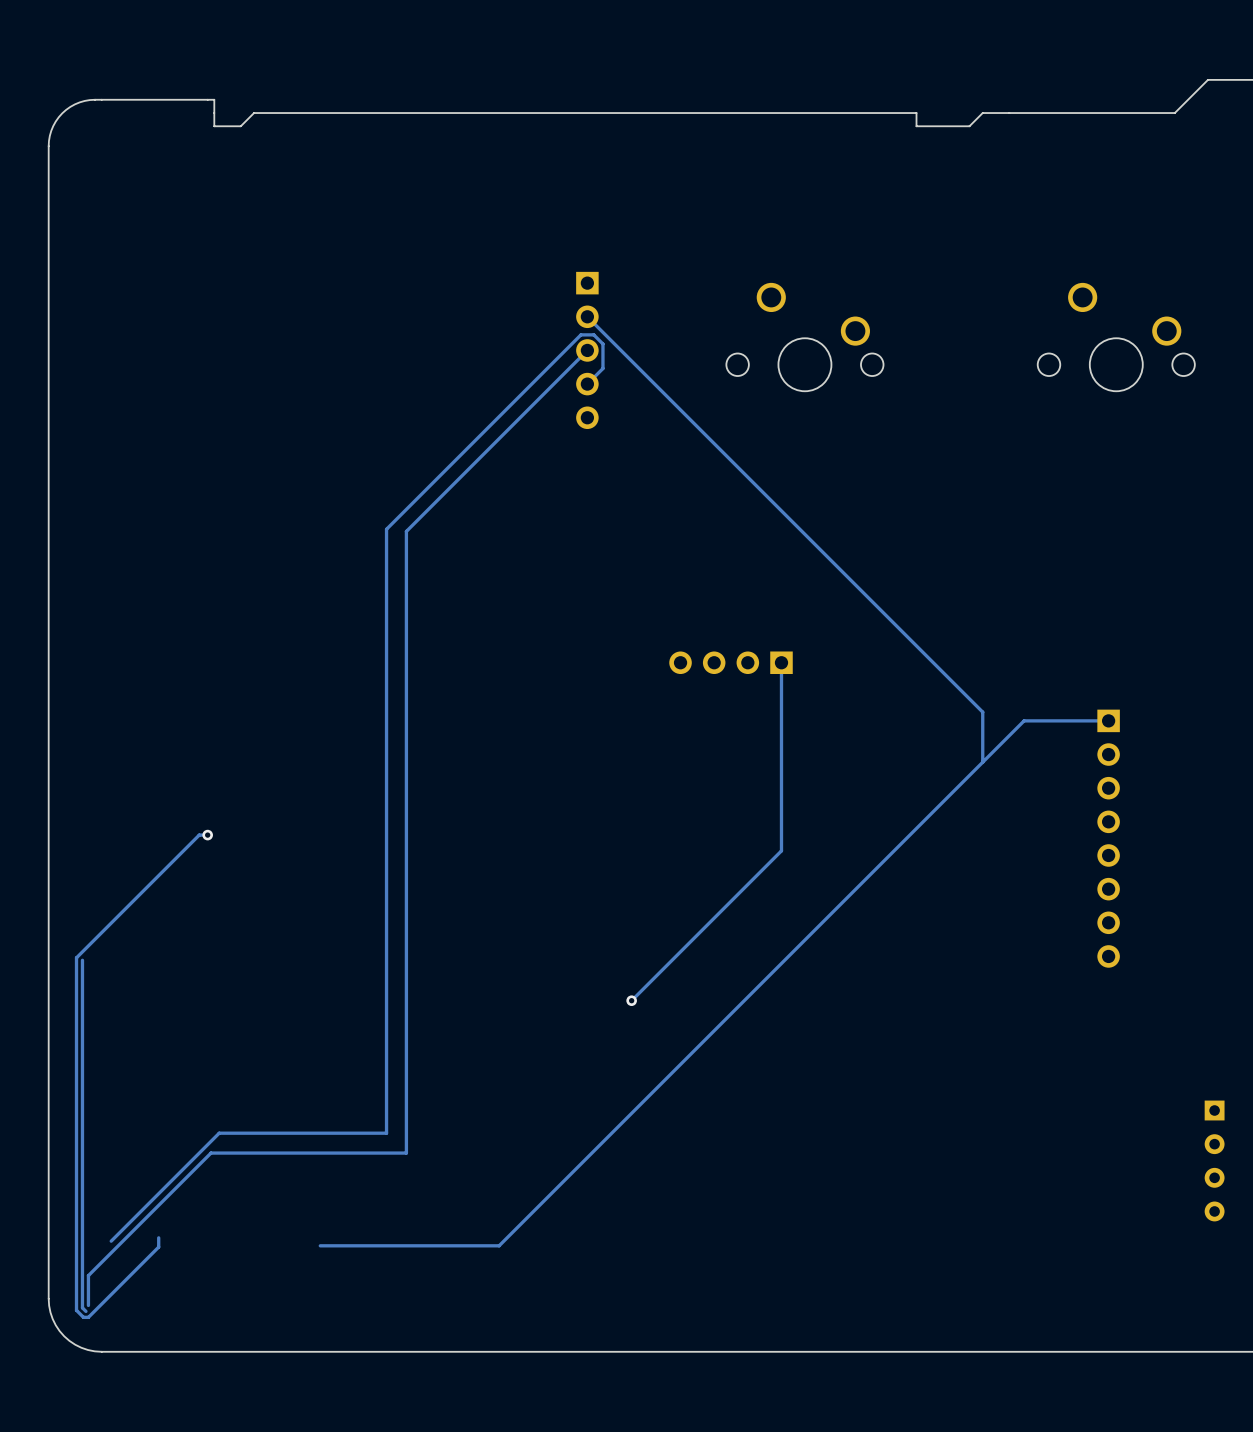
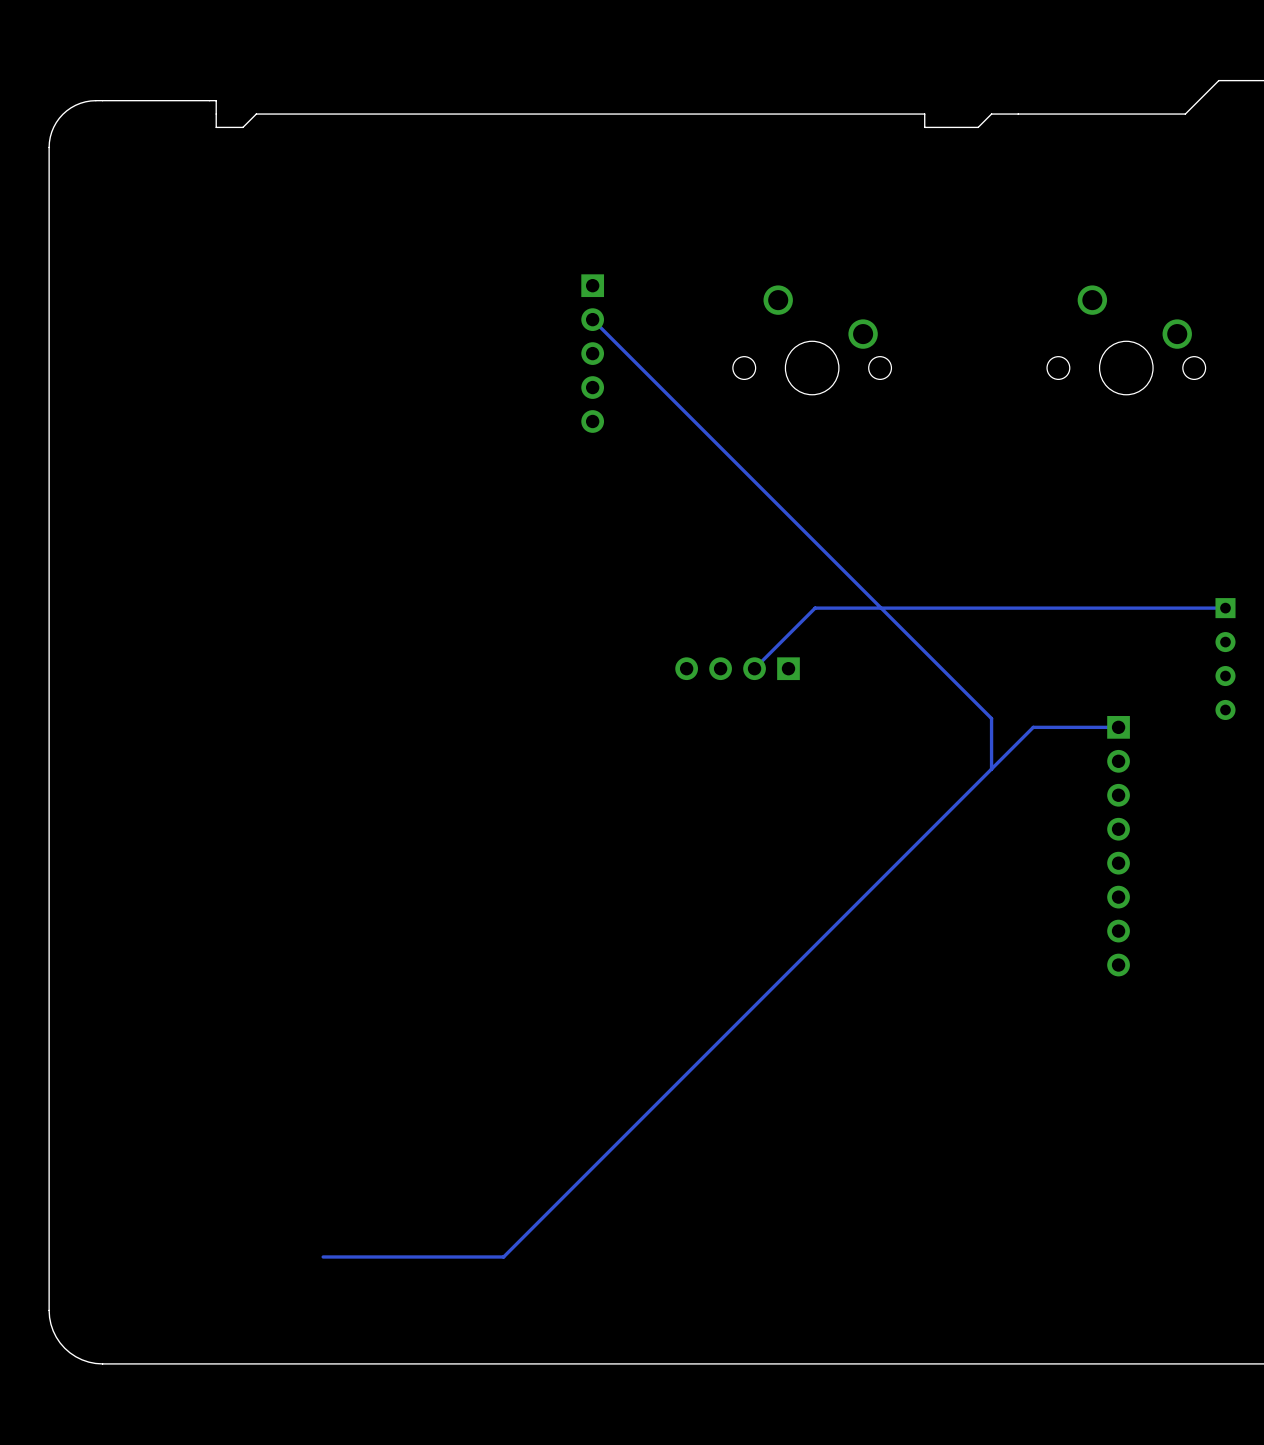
track: (587, 350) (406, 531) (406, 1153) (210, 1153) (88, 1275) (88, 1305) -> none
track: (587, 384) (602, 368) (602, 343) (593, 334) (580, 334) (386, 529) (386, 1133) (219, 1133) (111, 1241) -> none
track: none -> (1225, 608) (815, 608) (754, 668)
part: none -> (1225, 659)
track: (781, 662) (781, 850) (631, 1000) -> none
track: (207, 835) (199, 835) (76, 957) (76, 1310) (83, 1317) (88, 1317) (158, 1247) (158, 1237) -> none
via: (207, 835) -> none
track: (82, 960) (82, 1307) (85, 1311) -> none
via: (631, 1000) -> none
part: (1214, 1160) -> none

